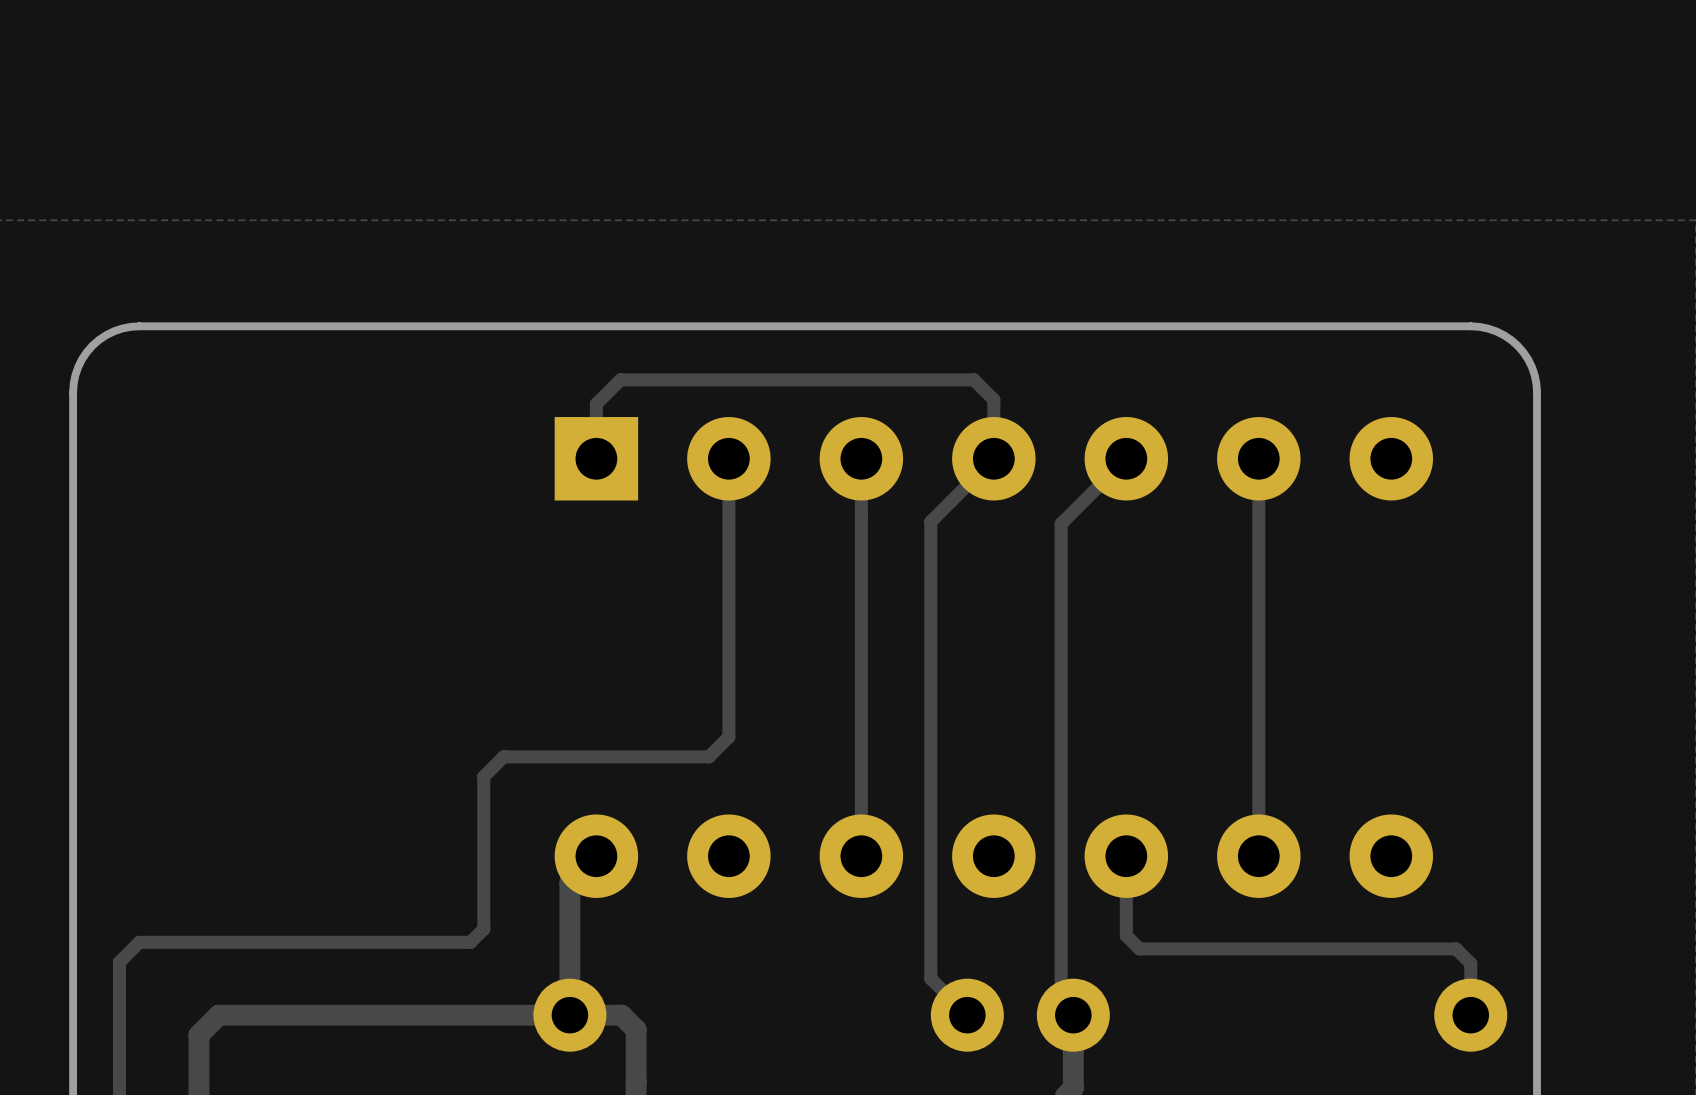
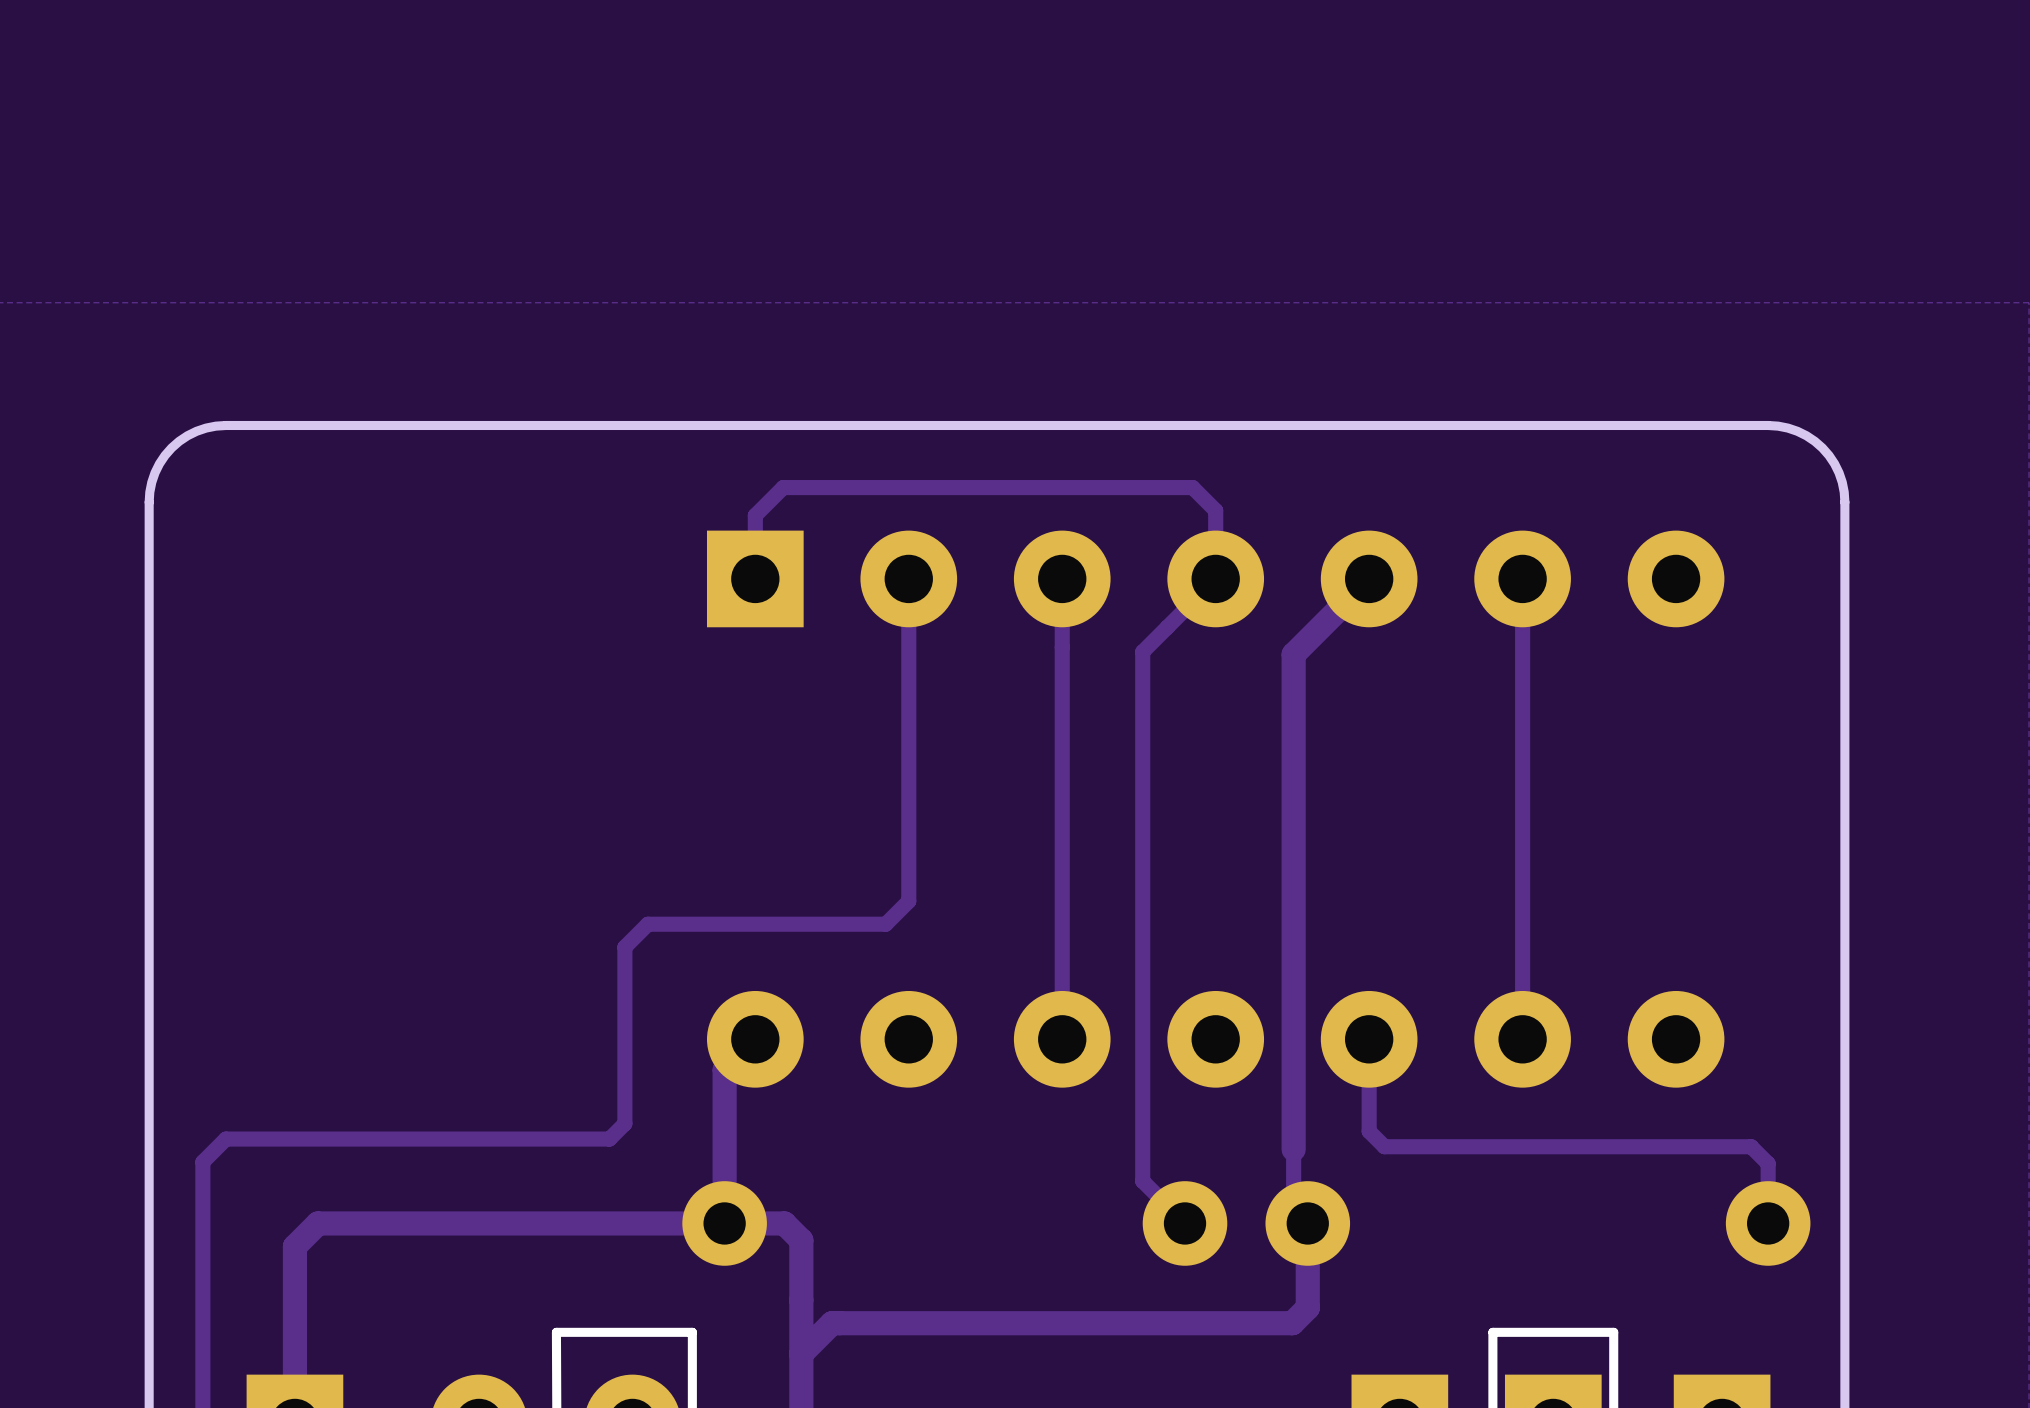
track width: thin (1126, 458) (1061, 523) (1061, 951) -> thick (1369, 578) (1293, 654) (1293, 1149)

